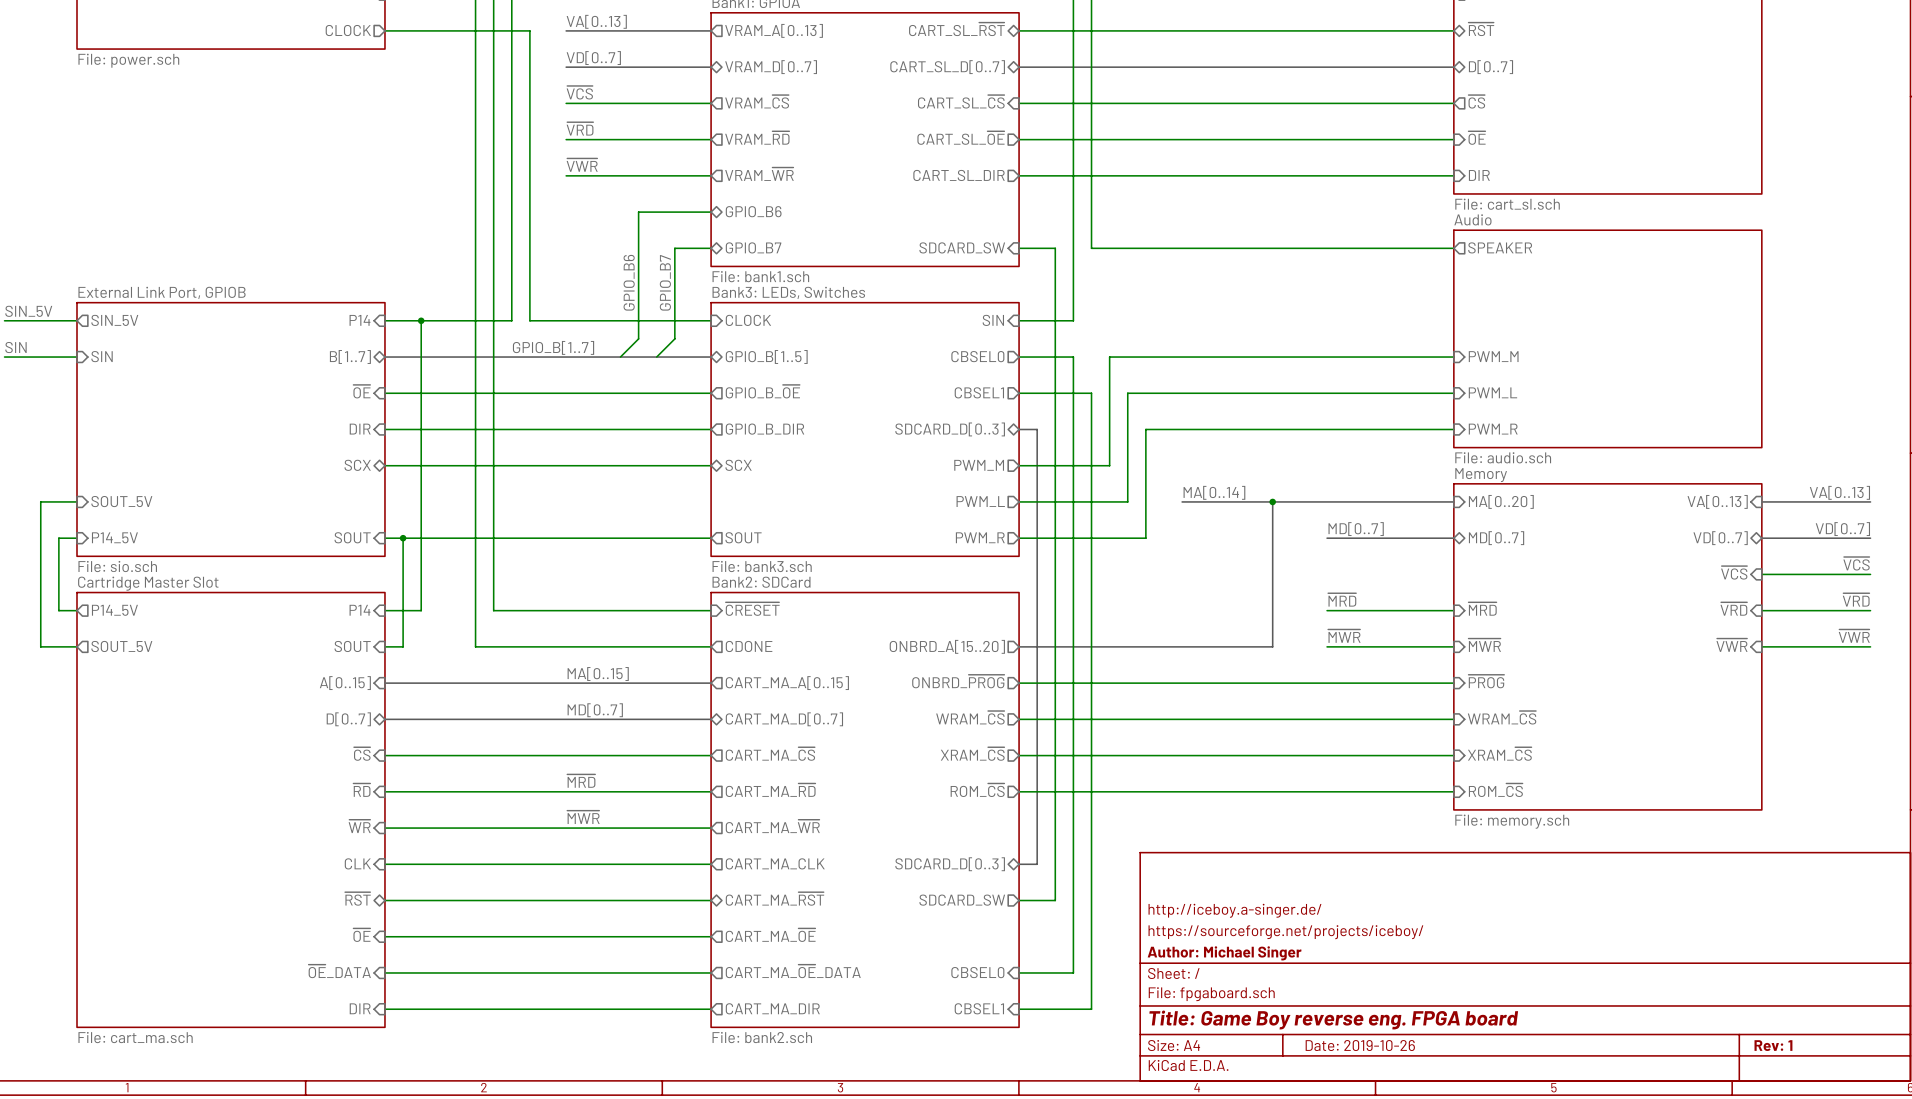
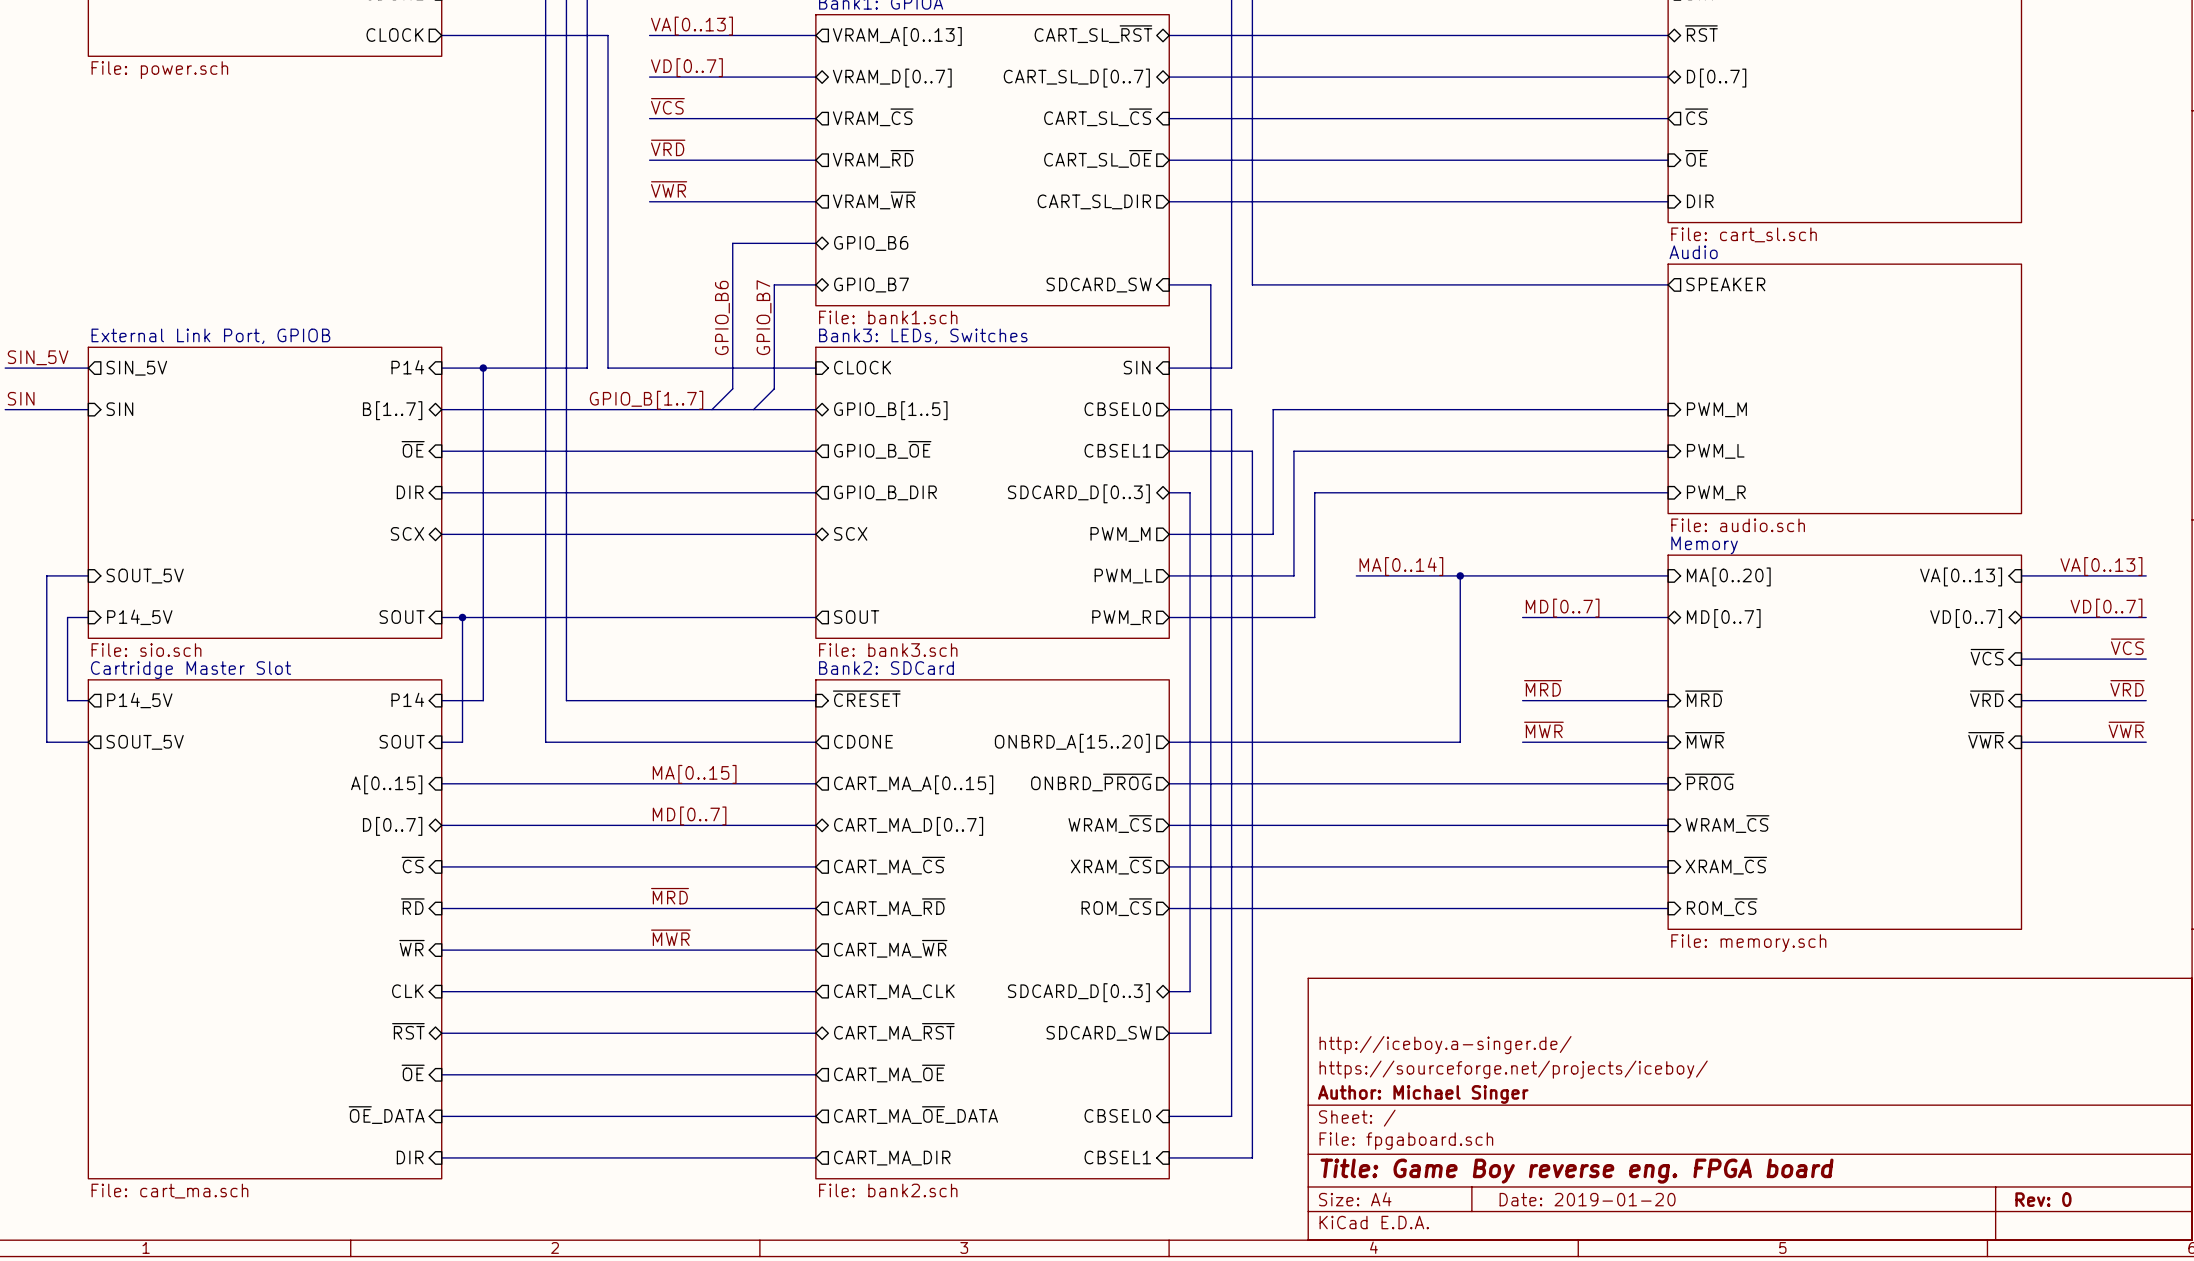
title block: Date: 2019-10-26 (1360, 1045) -> Date: 2019-01-20 (1587, 1199)
title block: Rev: 1 (1773, 1045) -> Rev: 0 (2043, 1199)

